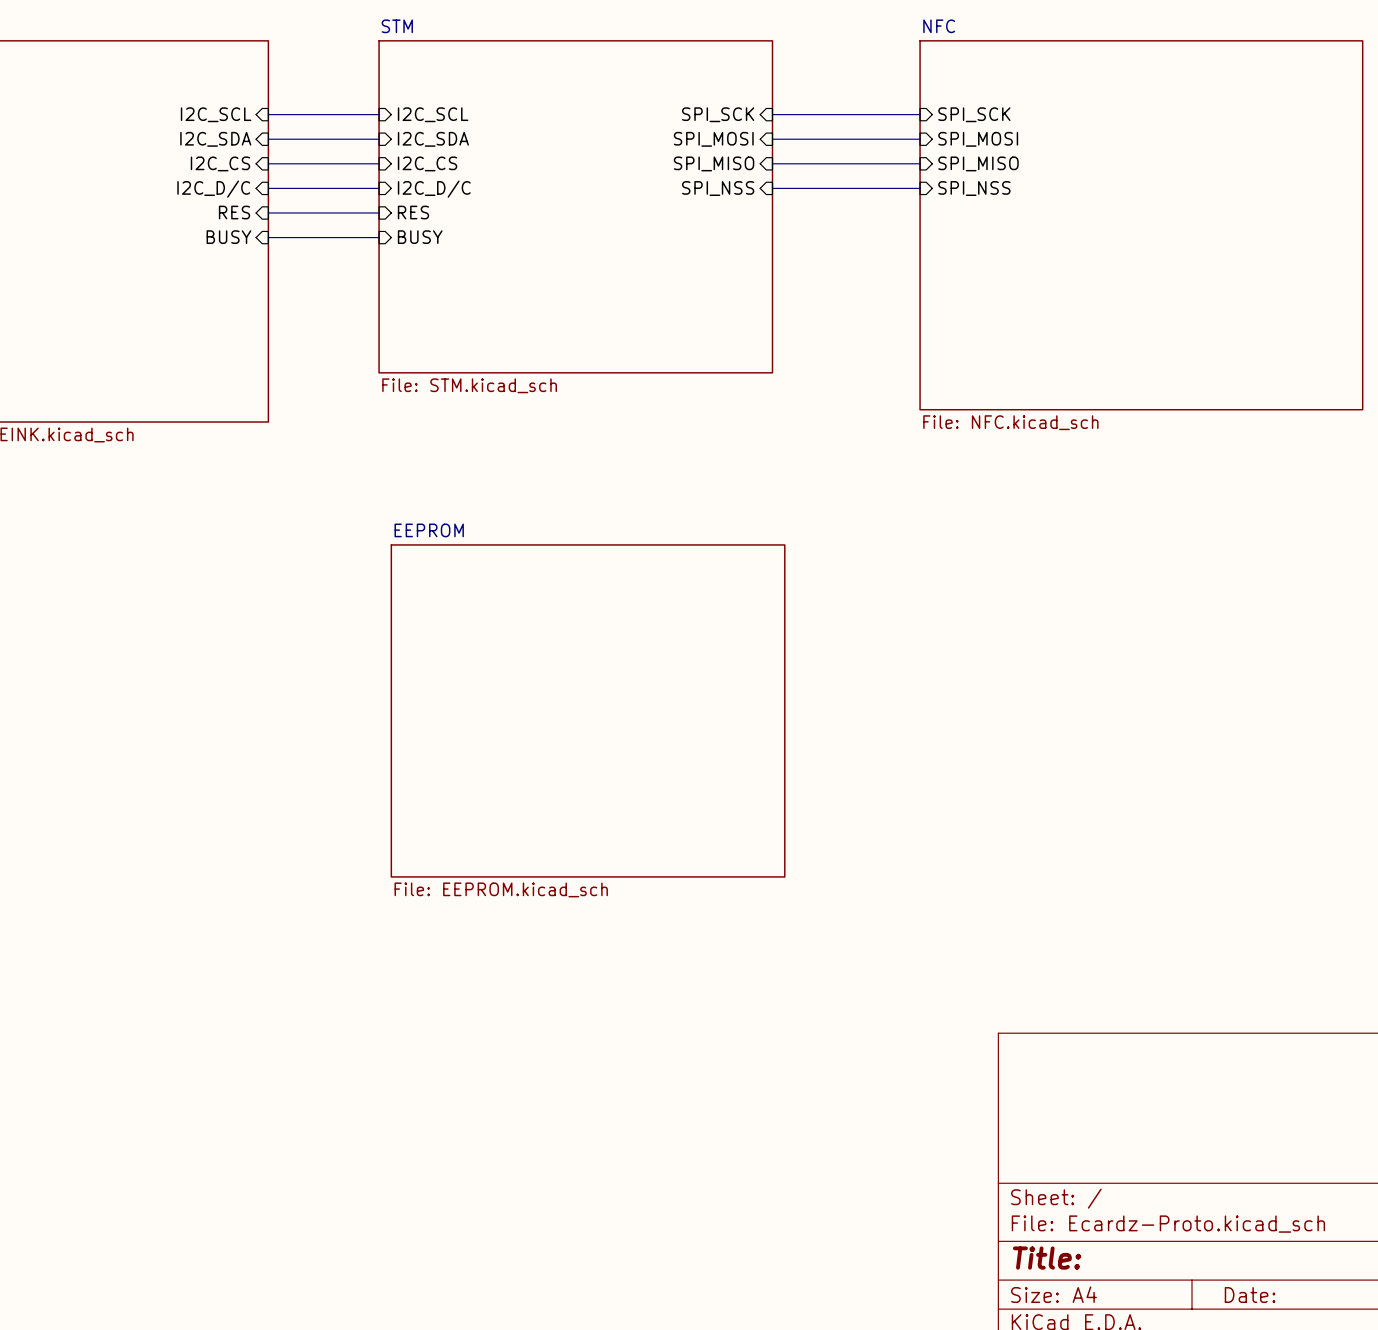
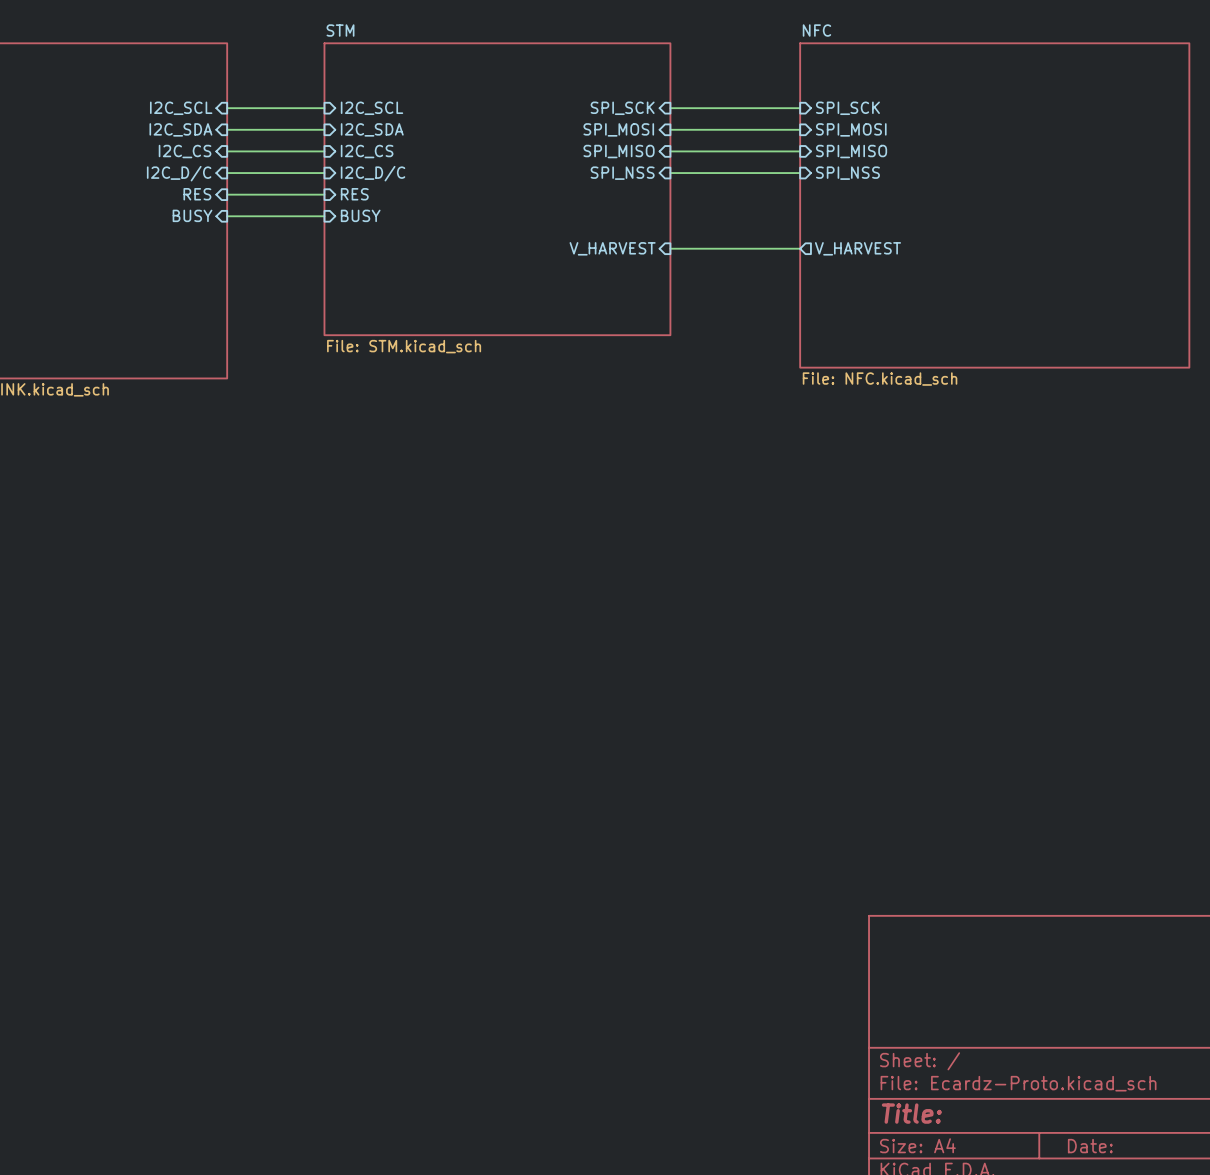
sheet pin: none -> V_HARVEST (612, 248)
wire: none -> (670, 248) (800, 248)
sheet pin: none -> V_HARVEST (857, 248)
sheet EEPROM: File: EEPROM.kicad_sch (588, 710) -> none

